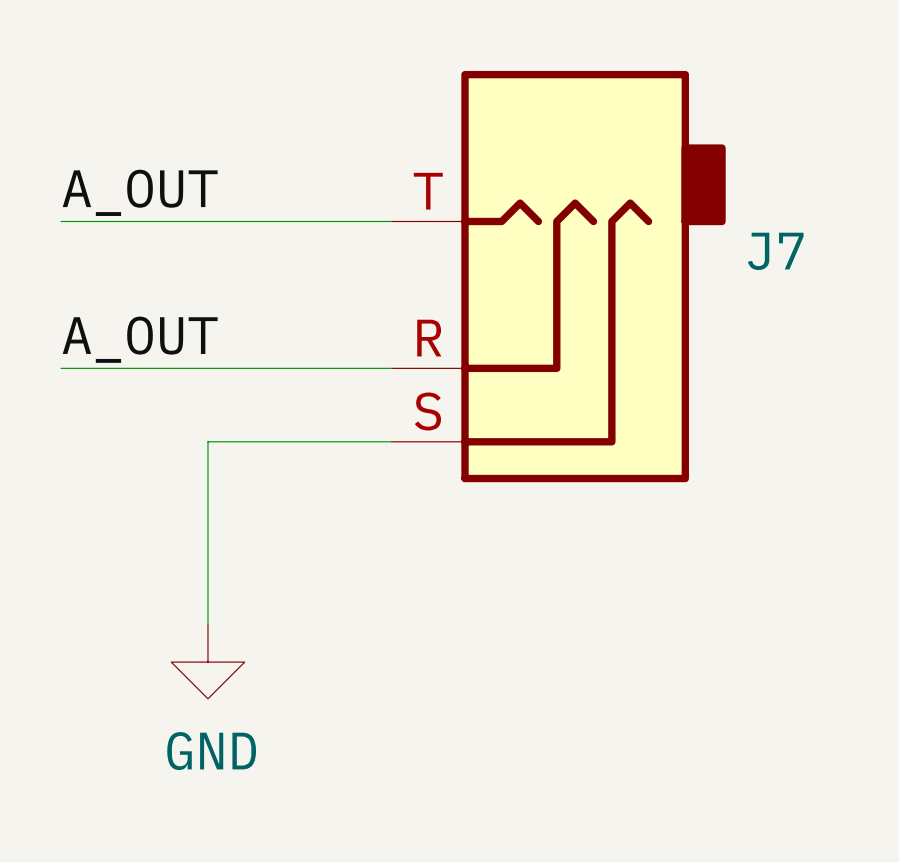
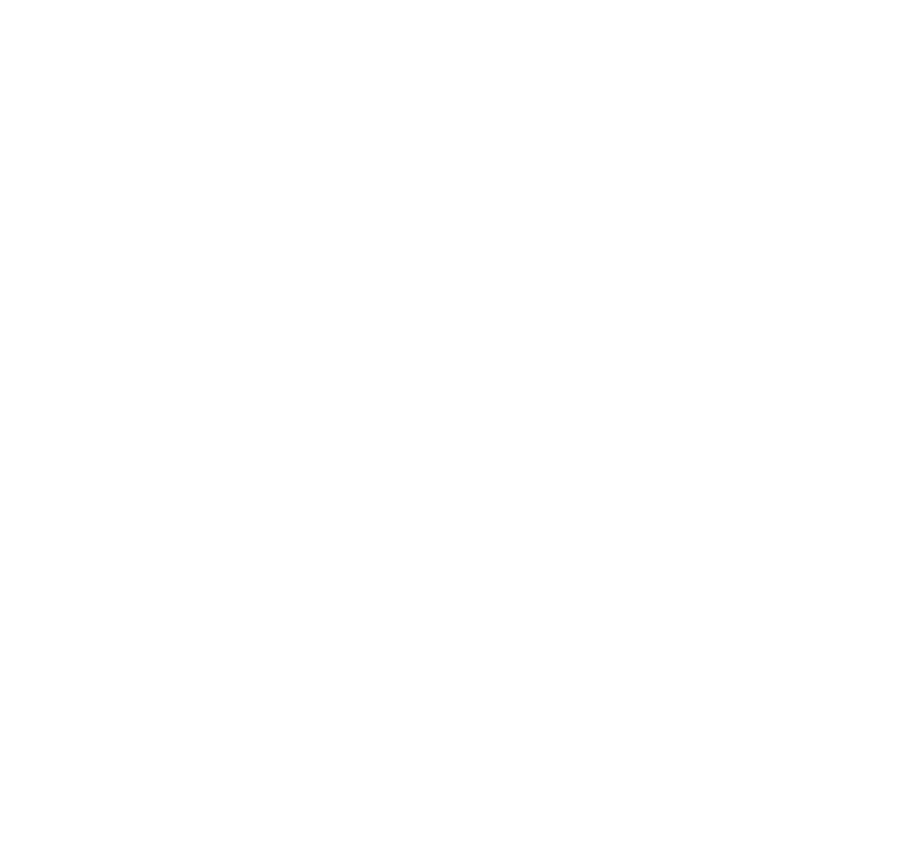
label: A_OUT (140, 192) -> none
wire: (61, 221) (391, 221) -> none
J7: (558, 276) -> none
label: A_OUT (140, 339) -> none
wire: (61, 368) (391, 368) -> none
wire: (391, 441) (207, 441) (207, 625) -> none
power symbol: GND (207, 662) -> none

